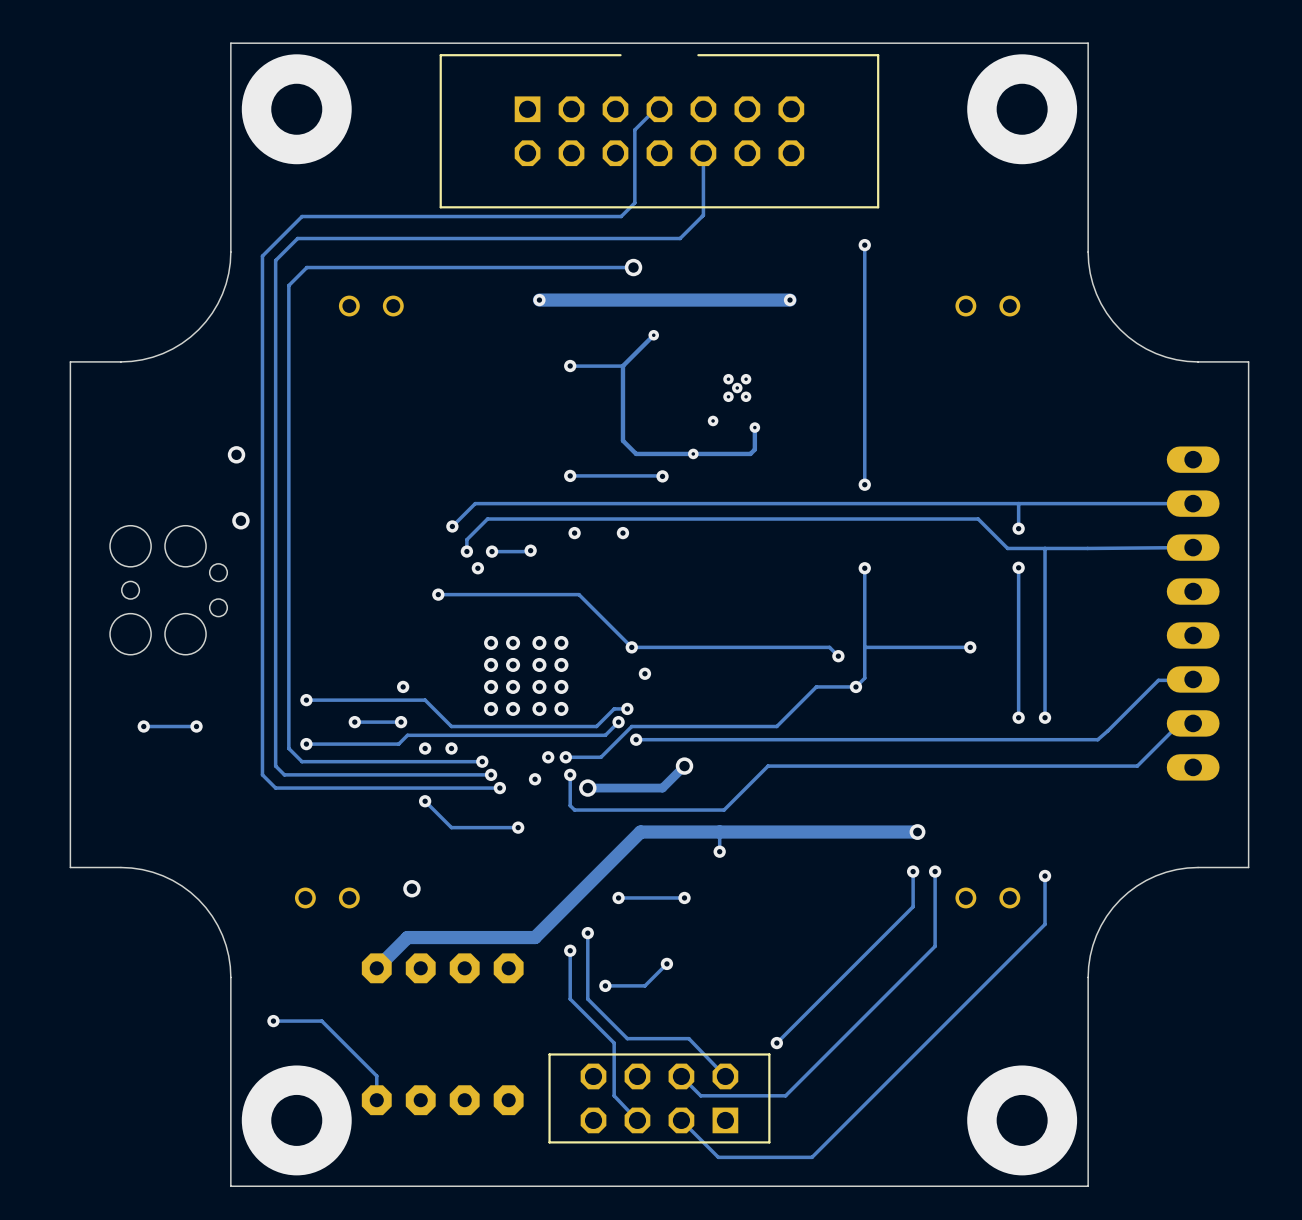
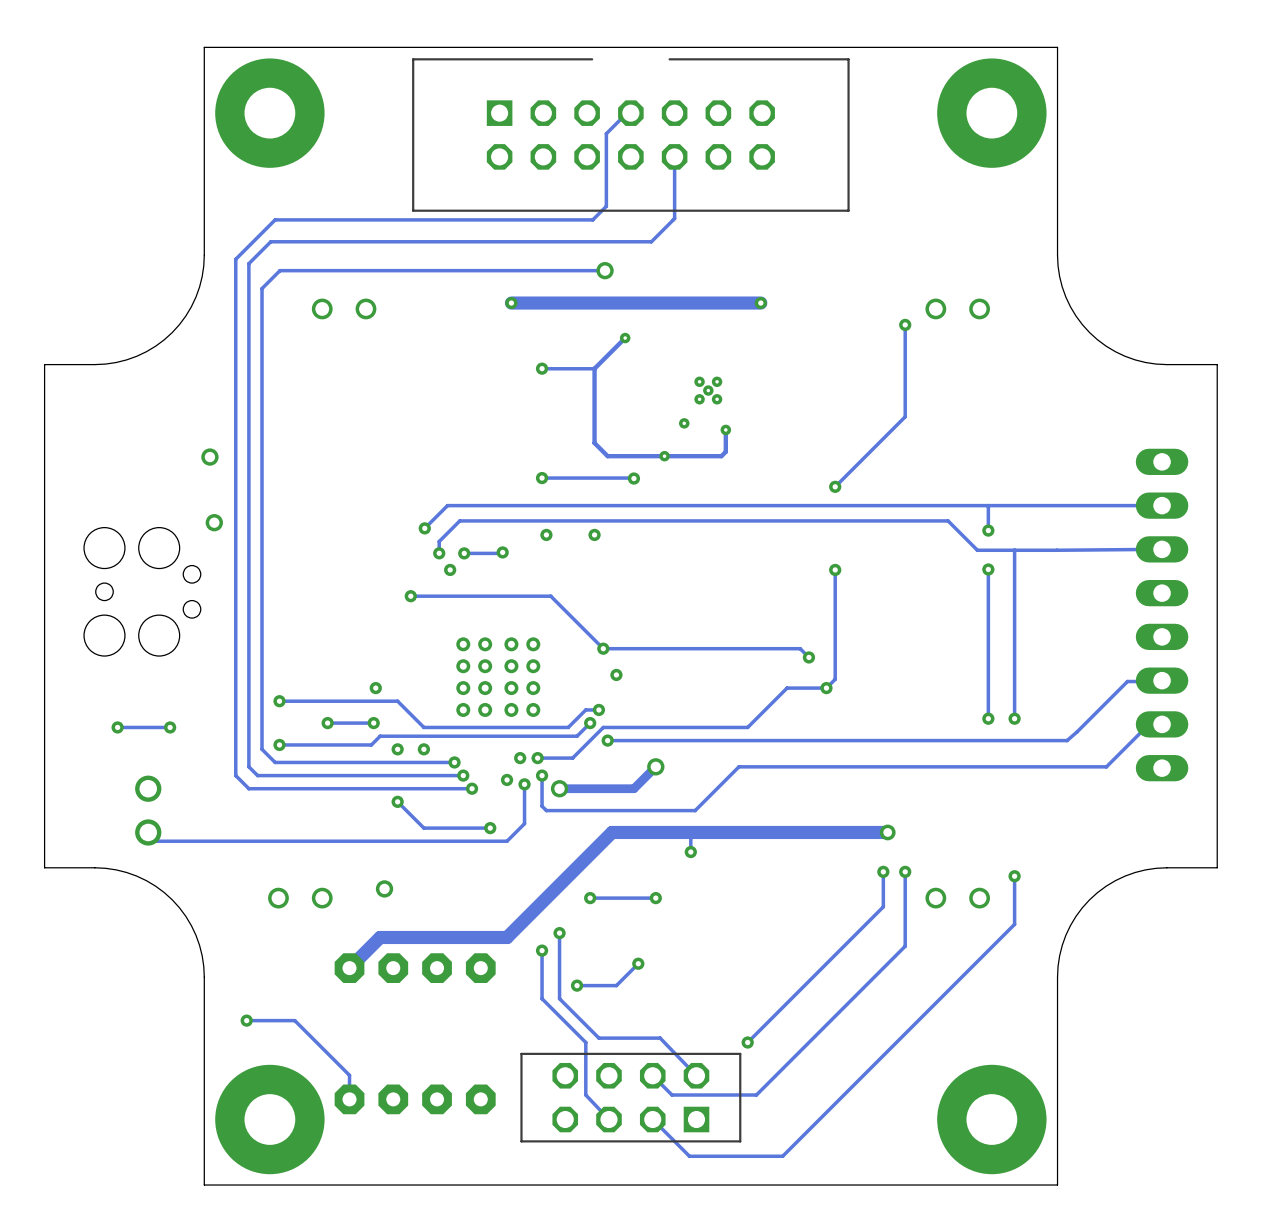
track: (864, 245) (864, 484) -> (905, 324) (905, 416) (835, 486)
via: (864, 245) -> none
via: none -> (905, 324)
track: (970, 647) (864, 647) -> none
via: (970, 647) -> none
track: none -> (524, 784) (524, 823) (507, 841) (157, 841) (148, 832)
via: none -> (524, 784)
part: none -> (148, 810)

